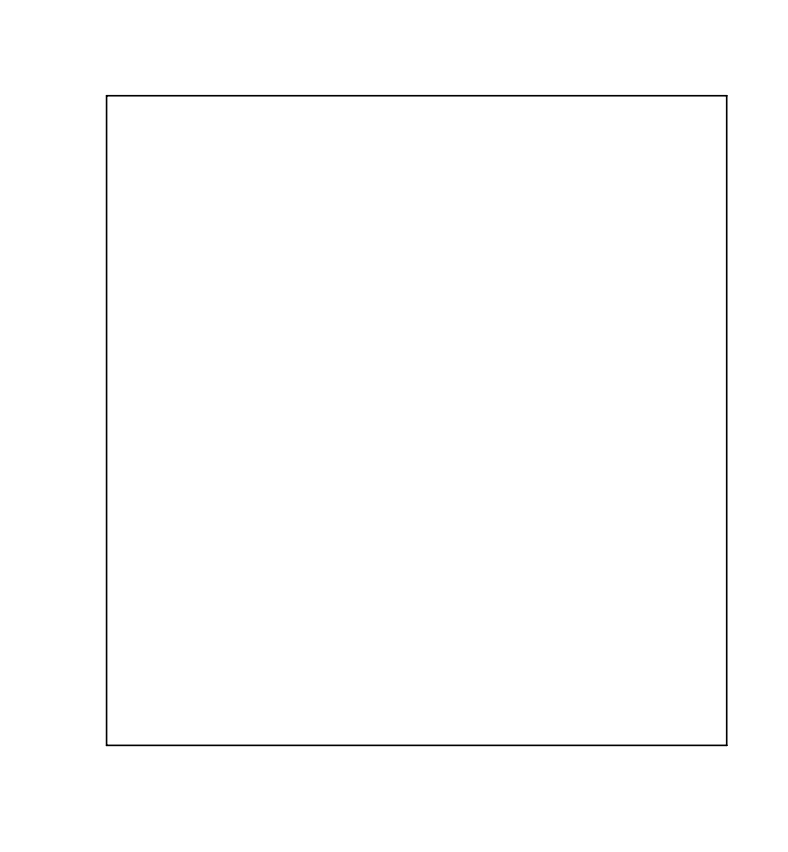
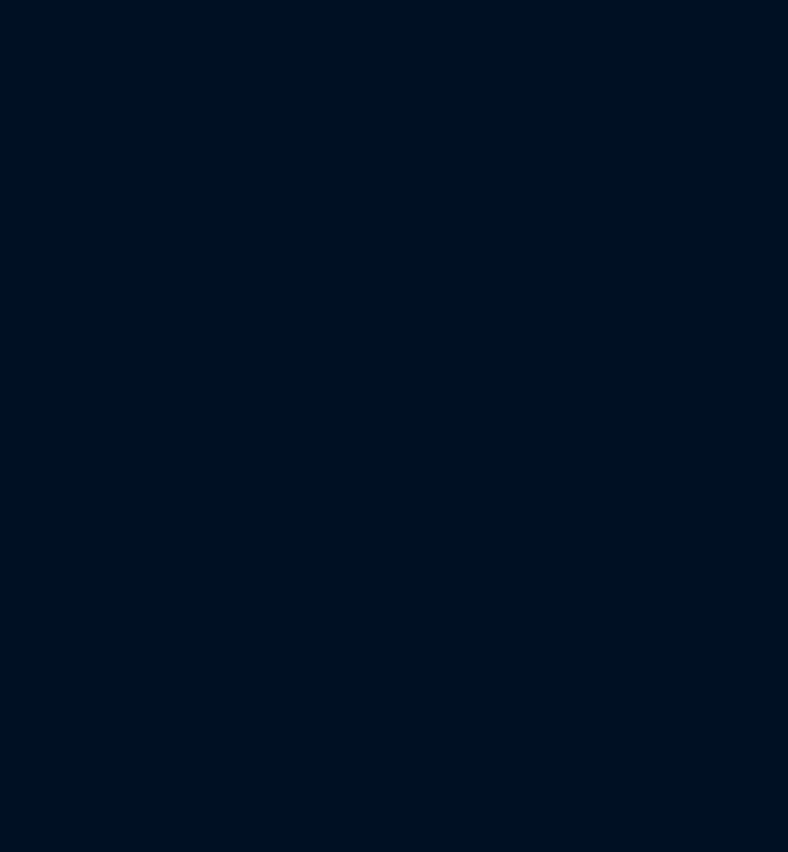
board edge: (106, 95) (726, 95) (726, 745) (106, 745) (106, 95) -> none

